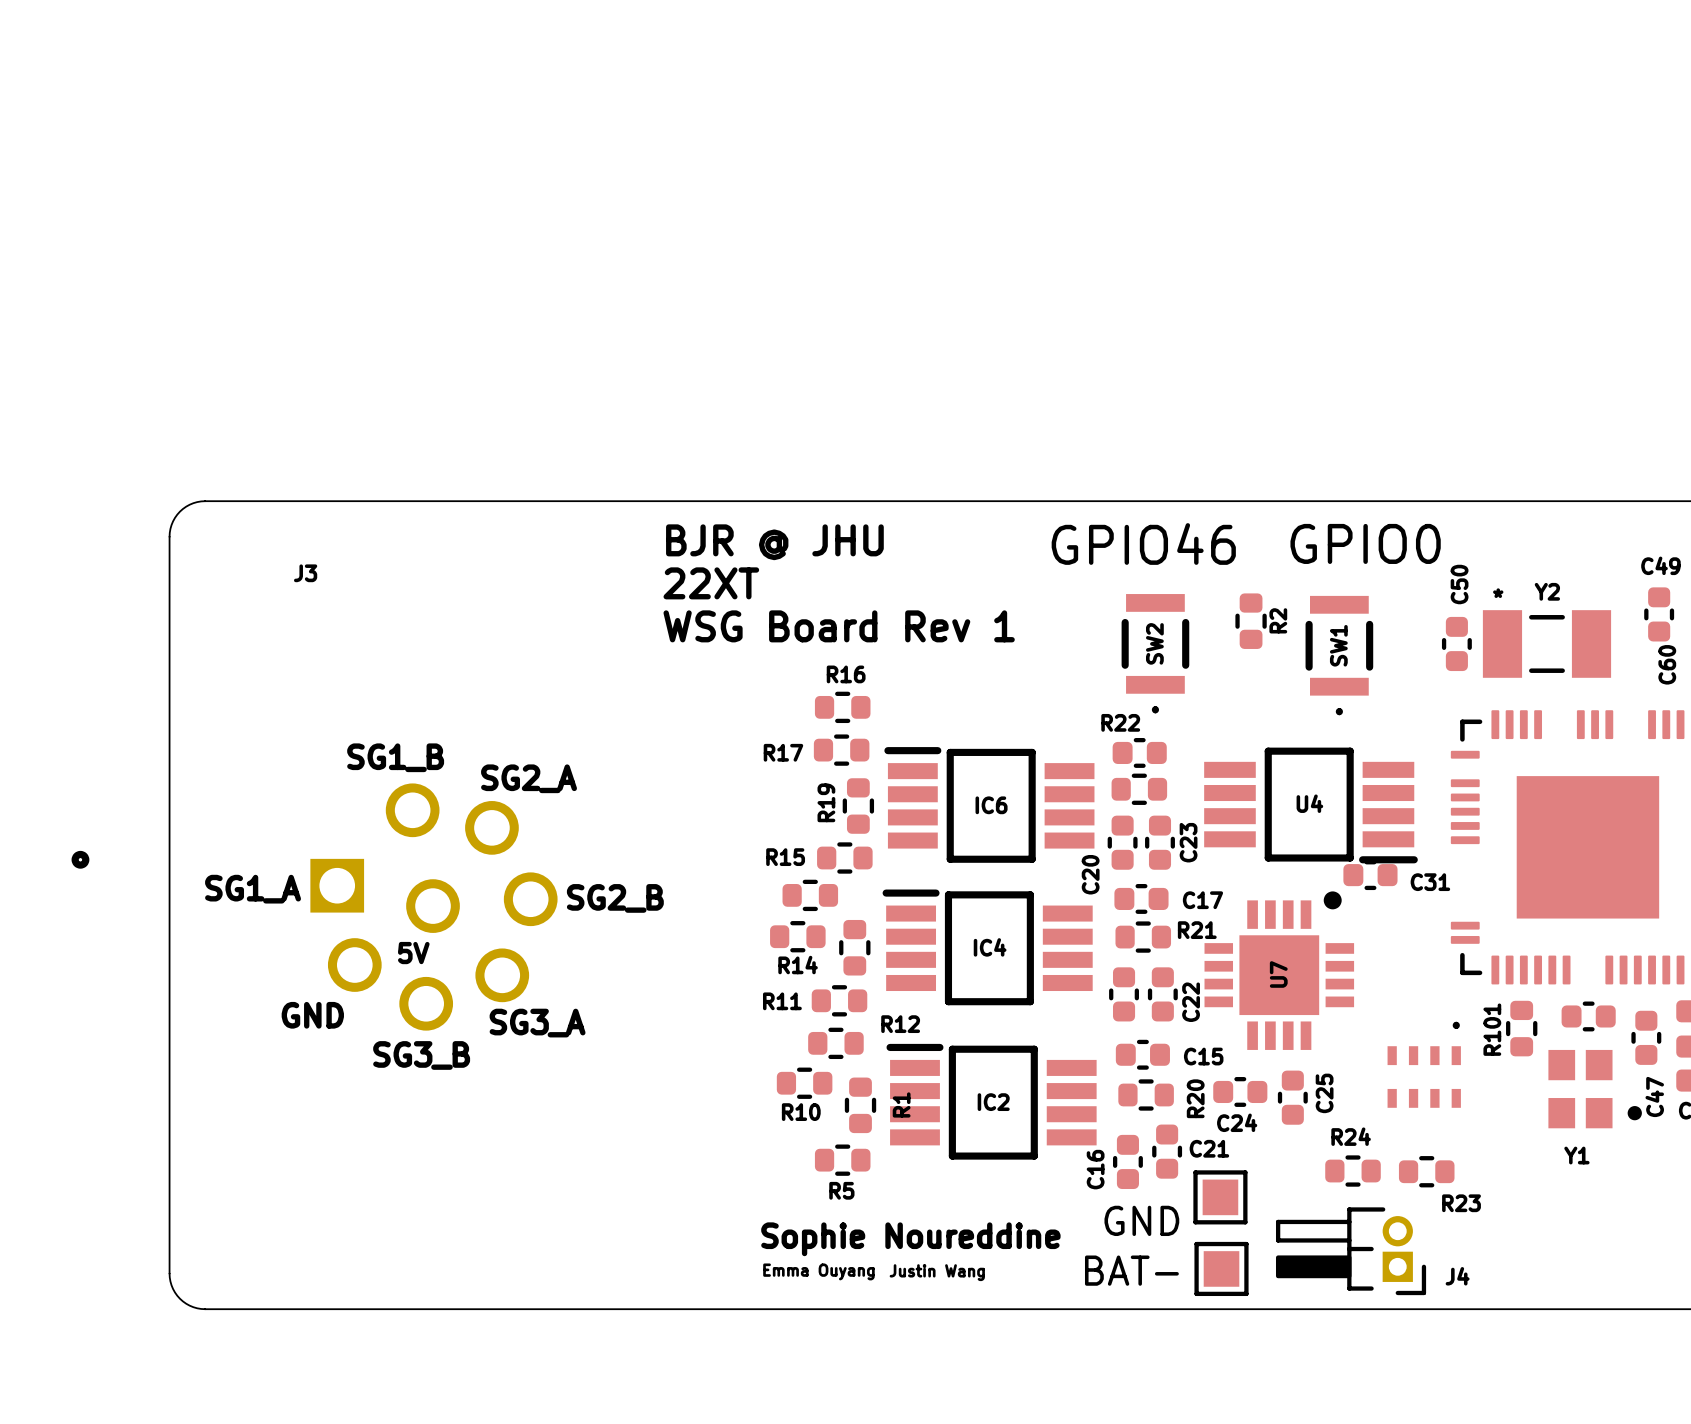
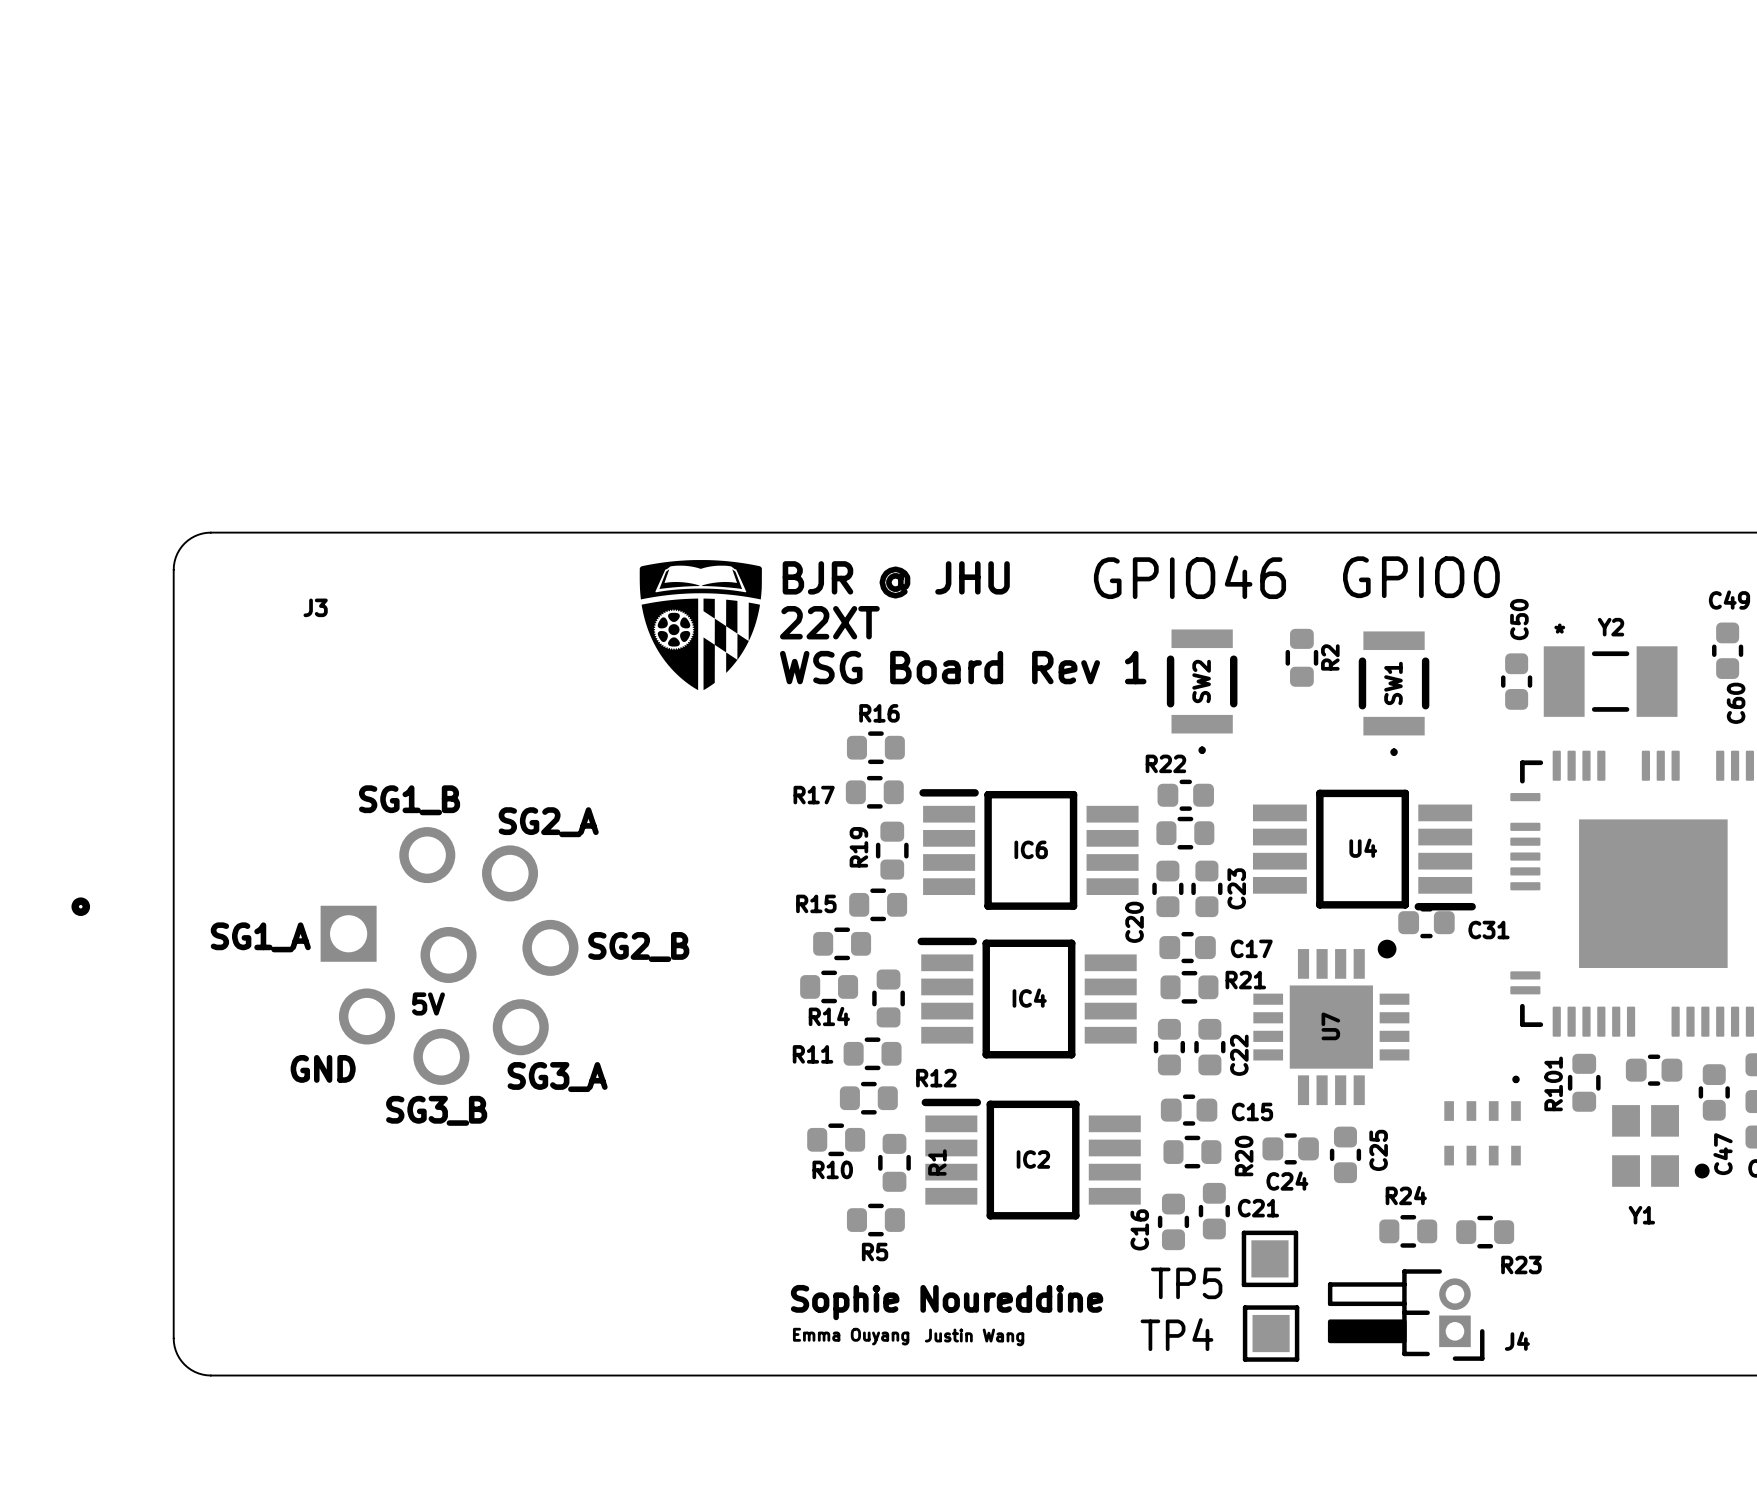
drawing: none -> [639, 560, 762, 691]
text position: BJR @ JHU (774, 542) -> BJR @ JHU (896, 579)
text position: 22XT (711, 583) -> 22XT (829, 622)
text position: WSG Board Rev 1 (839, 626) -> WSG Board Rev 1 (963, 667)
GND name: GND (1141, 1220) -> TP5 (1186, 1283)
BAT- name: BAT- (1131, 1270) -> TP4 (1176, 1334)

